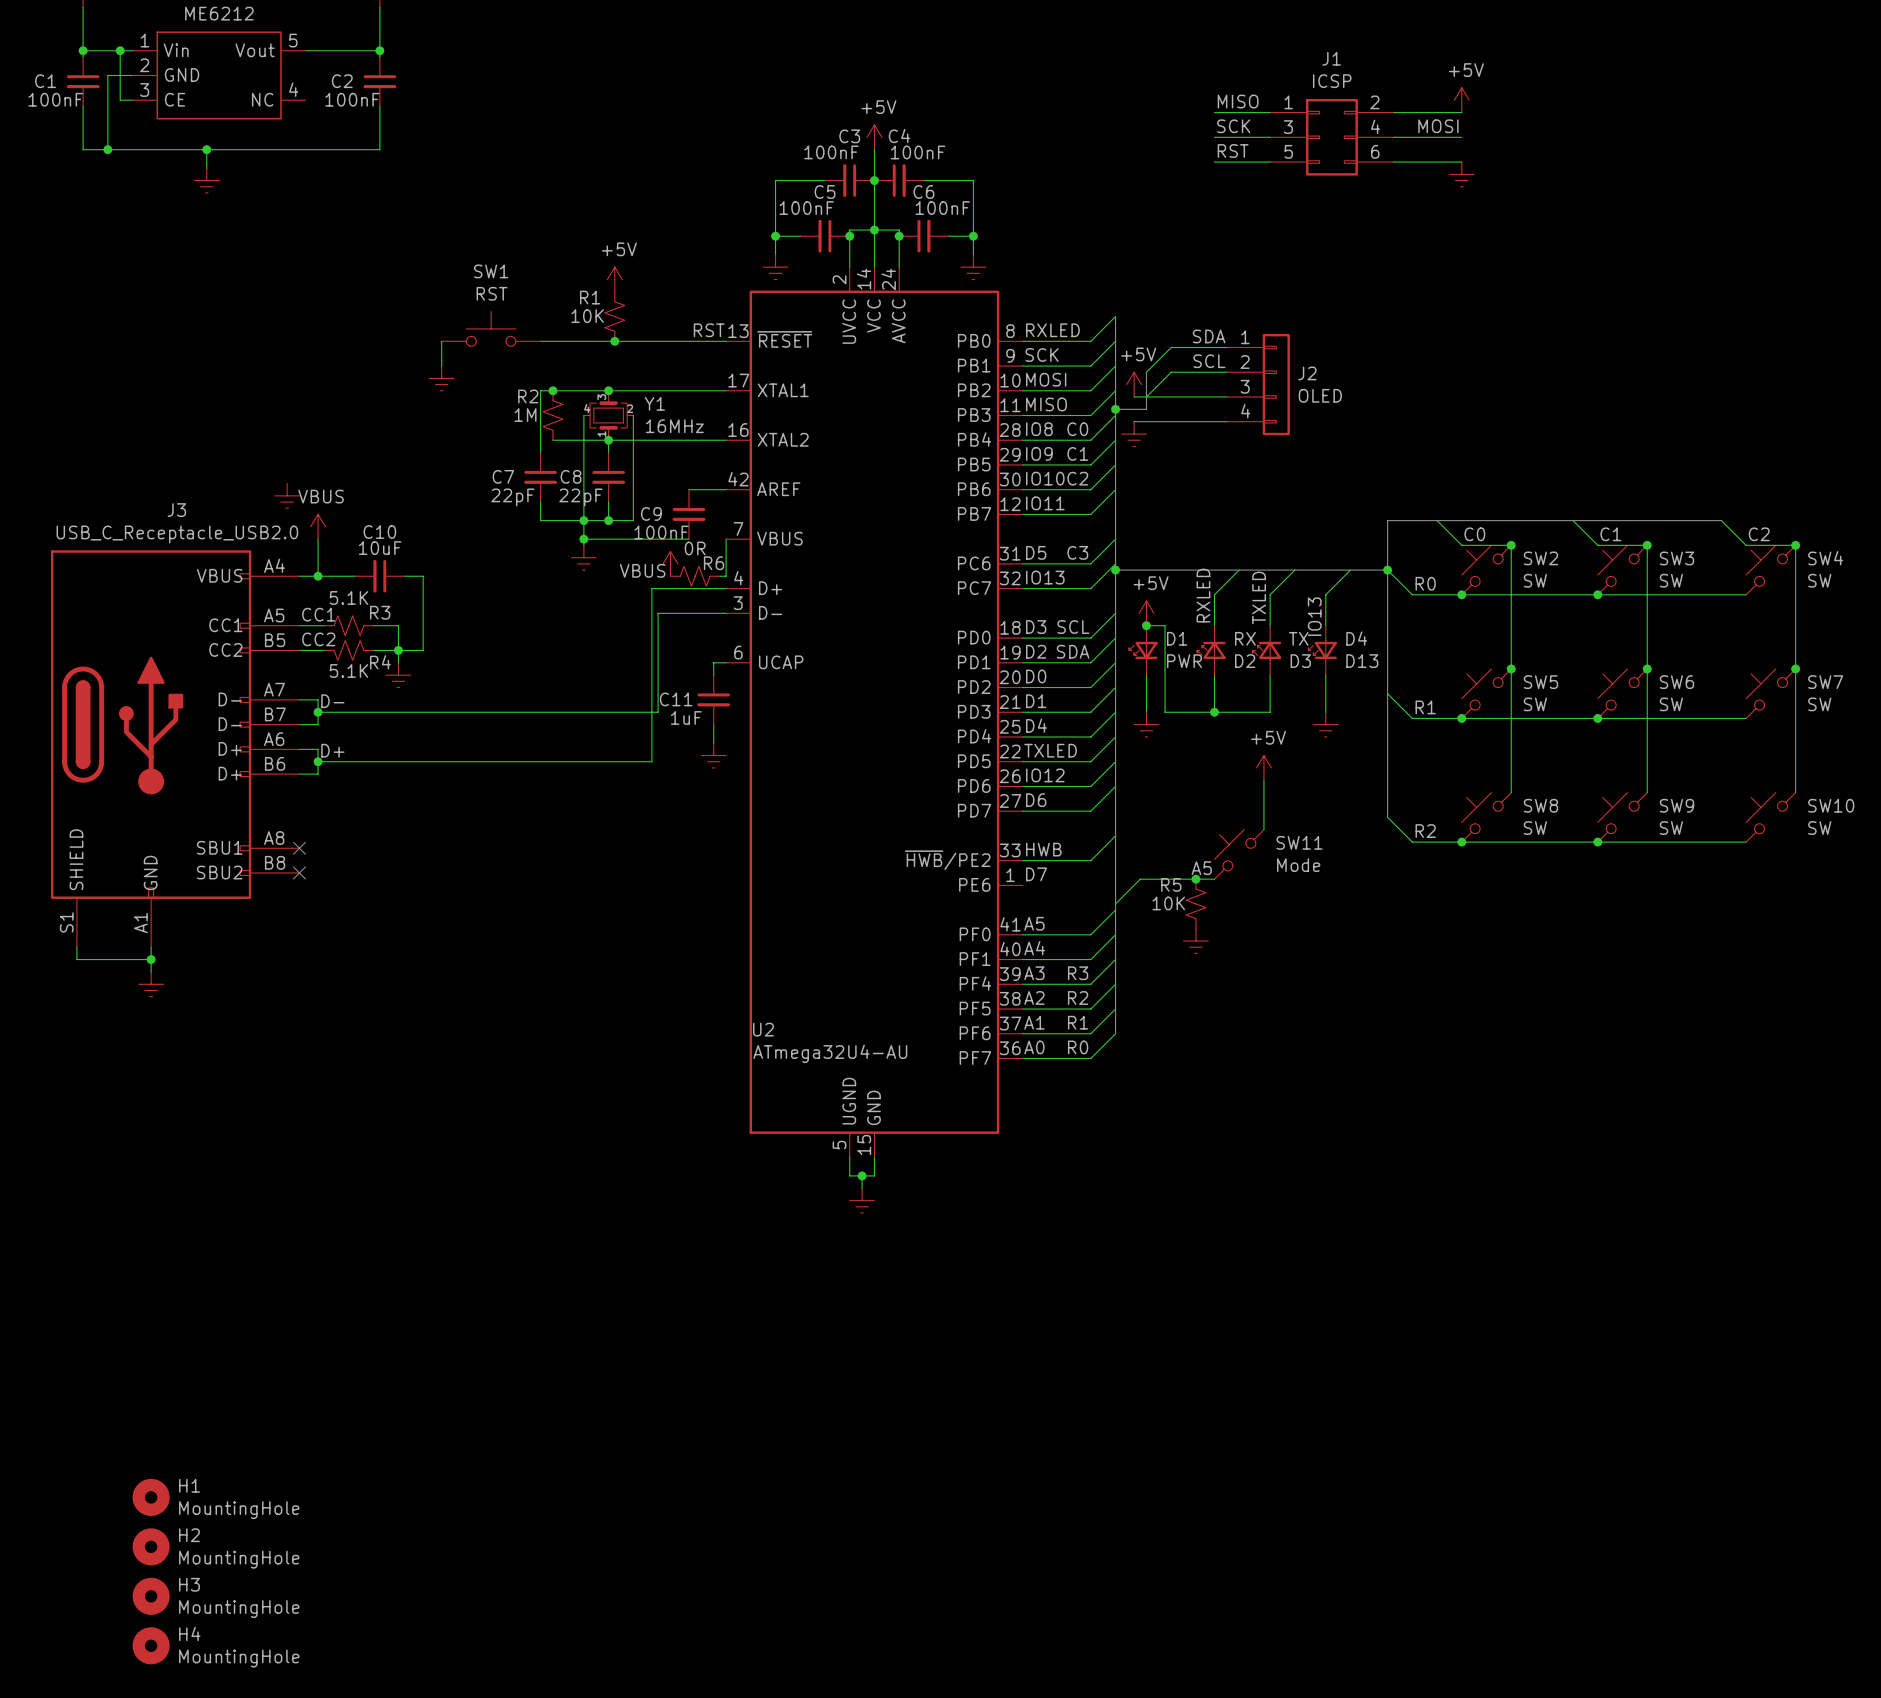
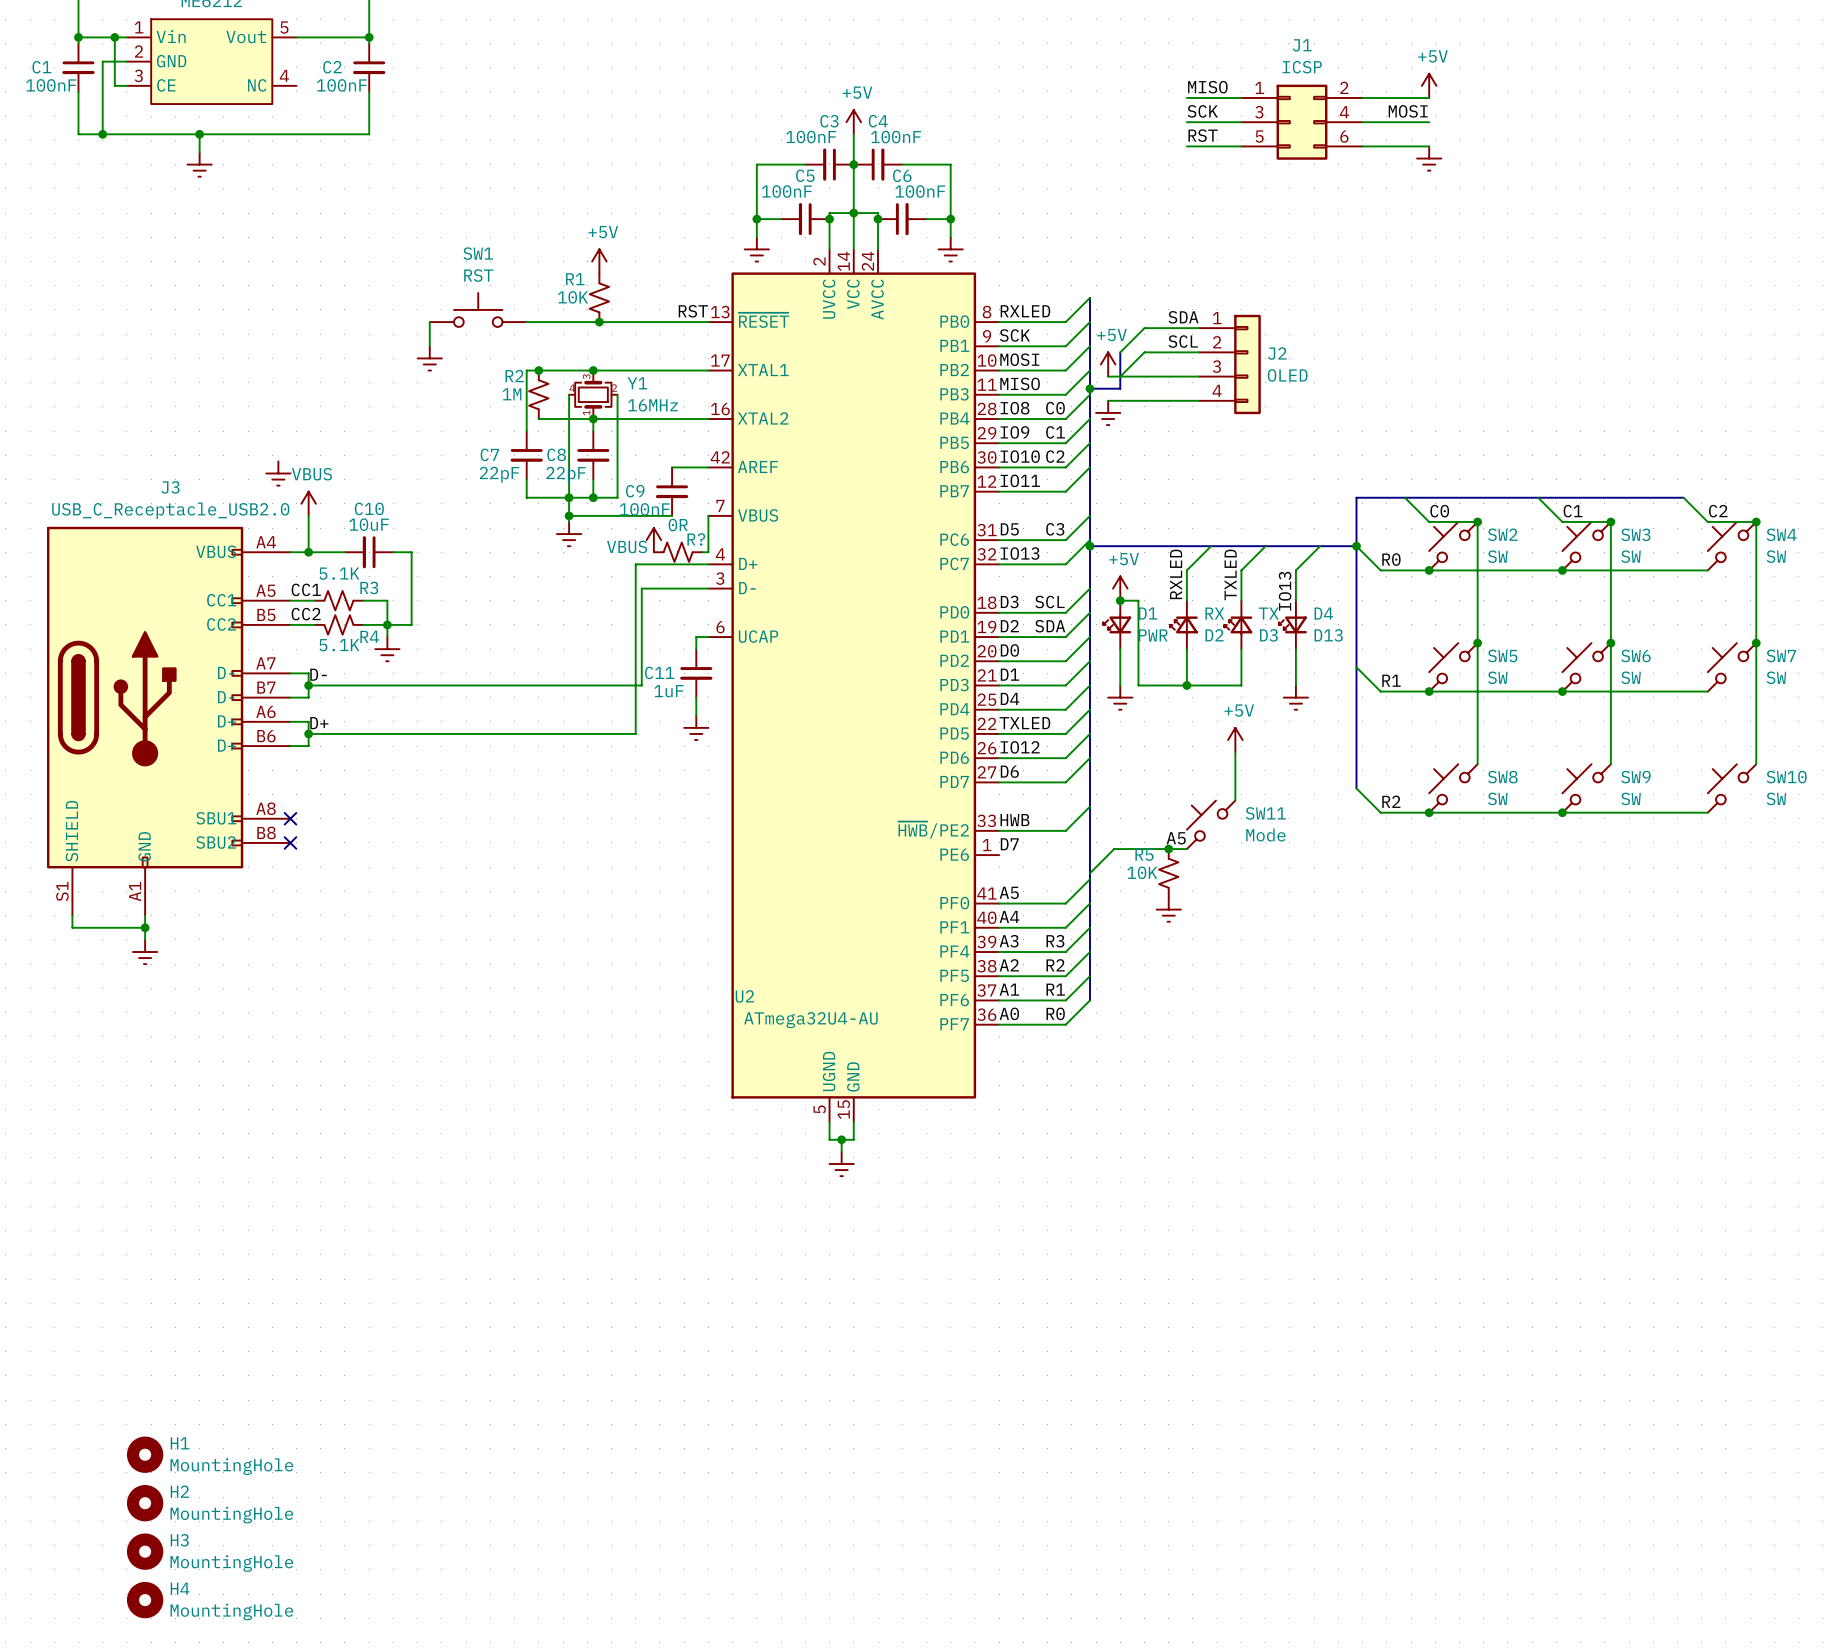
R6 name: R6 (714, 563) -> R? (696, 539)

